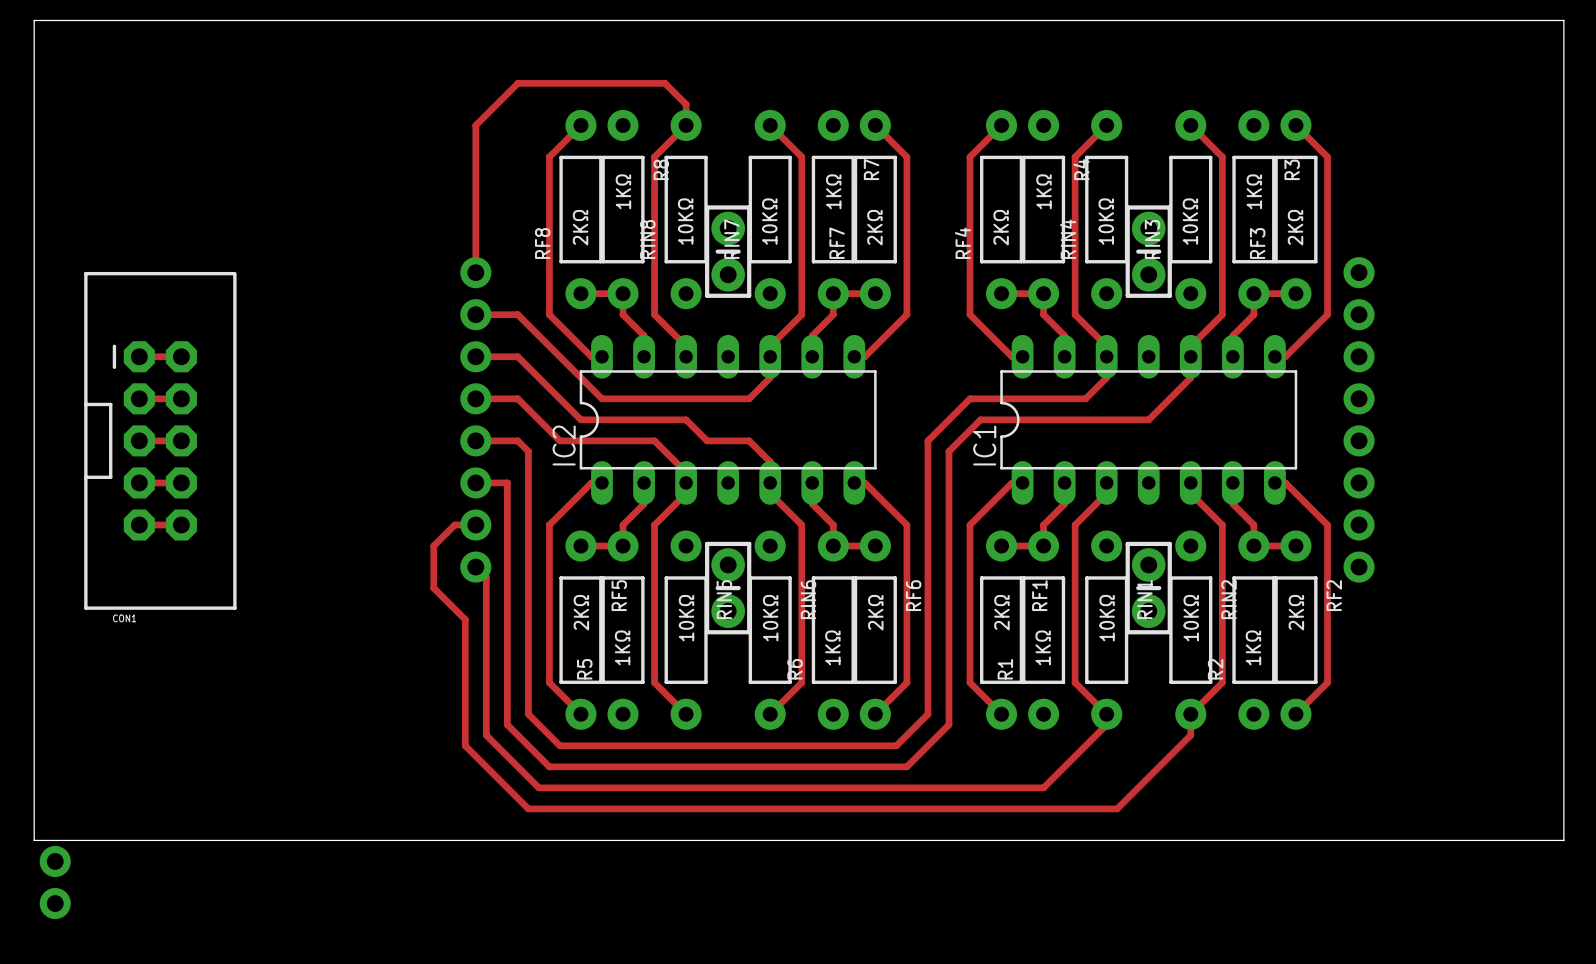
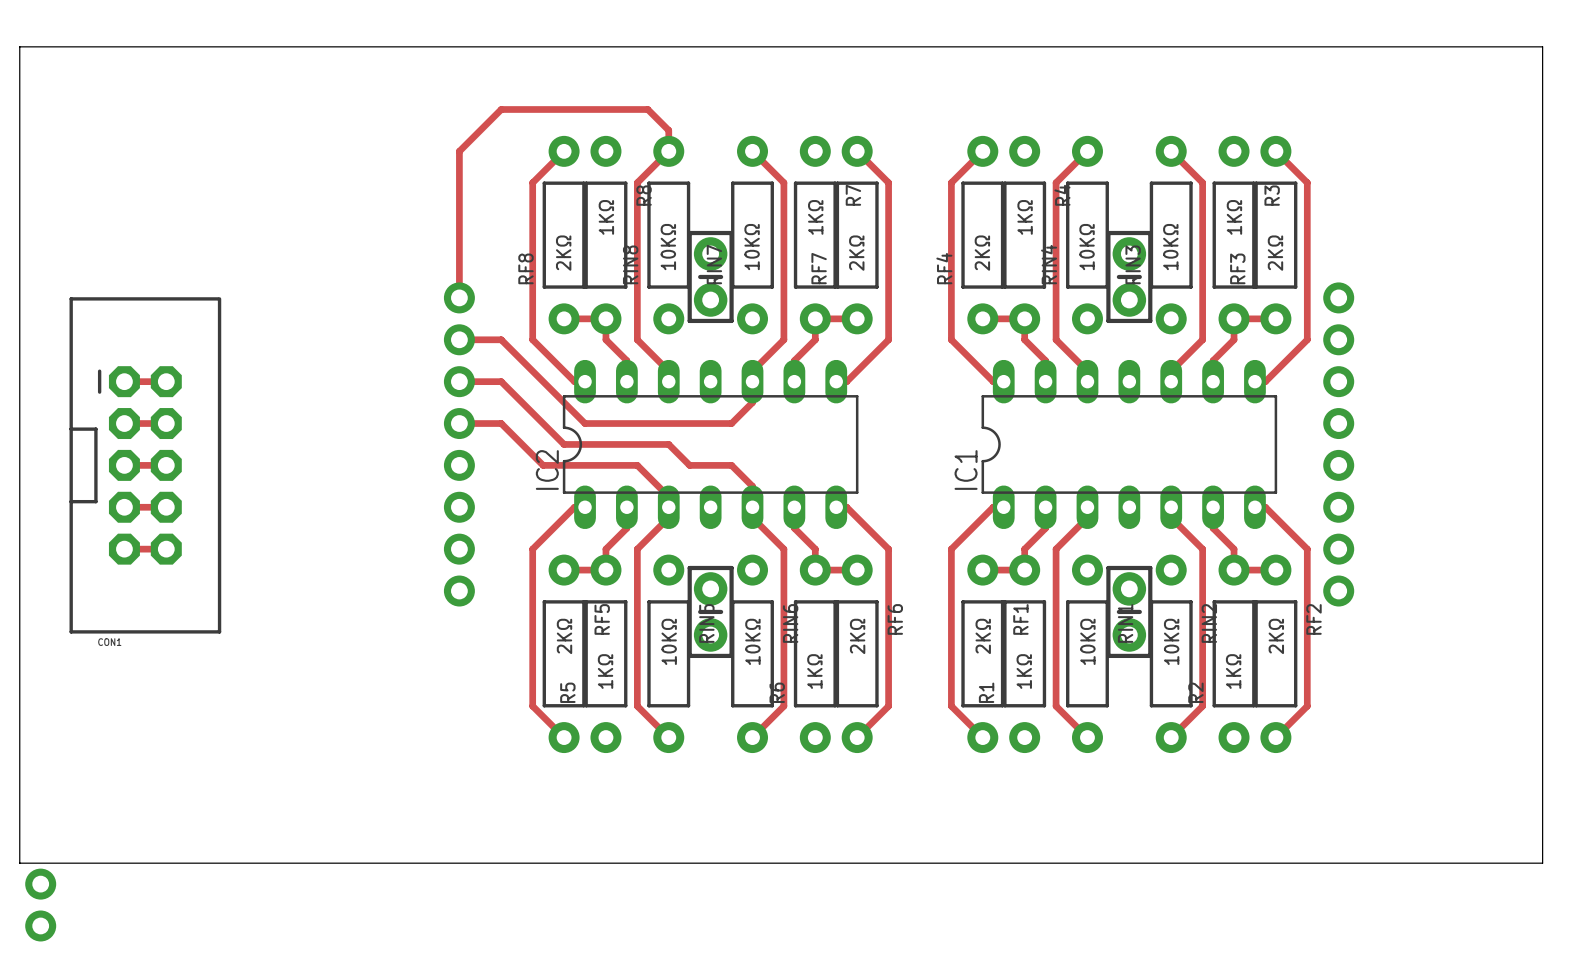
top track: (1106, 356) (1106, 377) (1085, 398) (970, 398) (927, 440) (927, 714) (896, 745) (559, 745) (528, 714) (528, 451) (517, 440) (475, 440) -> none
top track: (1190, 356) (1190, 377) (1148, 419) (980, 419) (948, 451) (948, 724) (906, 766) (549, 766) (507, 724) (507, 482) (475, 482) -> none
top track: (475, 525) (454, 525) (433, 546) (433, 588) (465, 619) (465, 745) (528, 808) (1117, 808) (1190, 735) (1190, 714) -> none
top track: (475, 567) (486, 577) (486, 735) (538, 787) (1043, 787) (1106, 724) (1106, 714) -> none

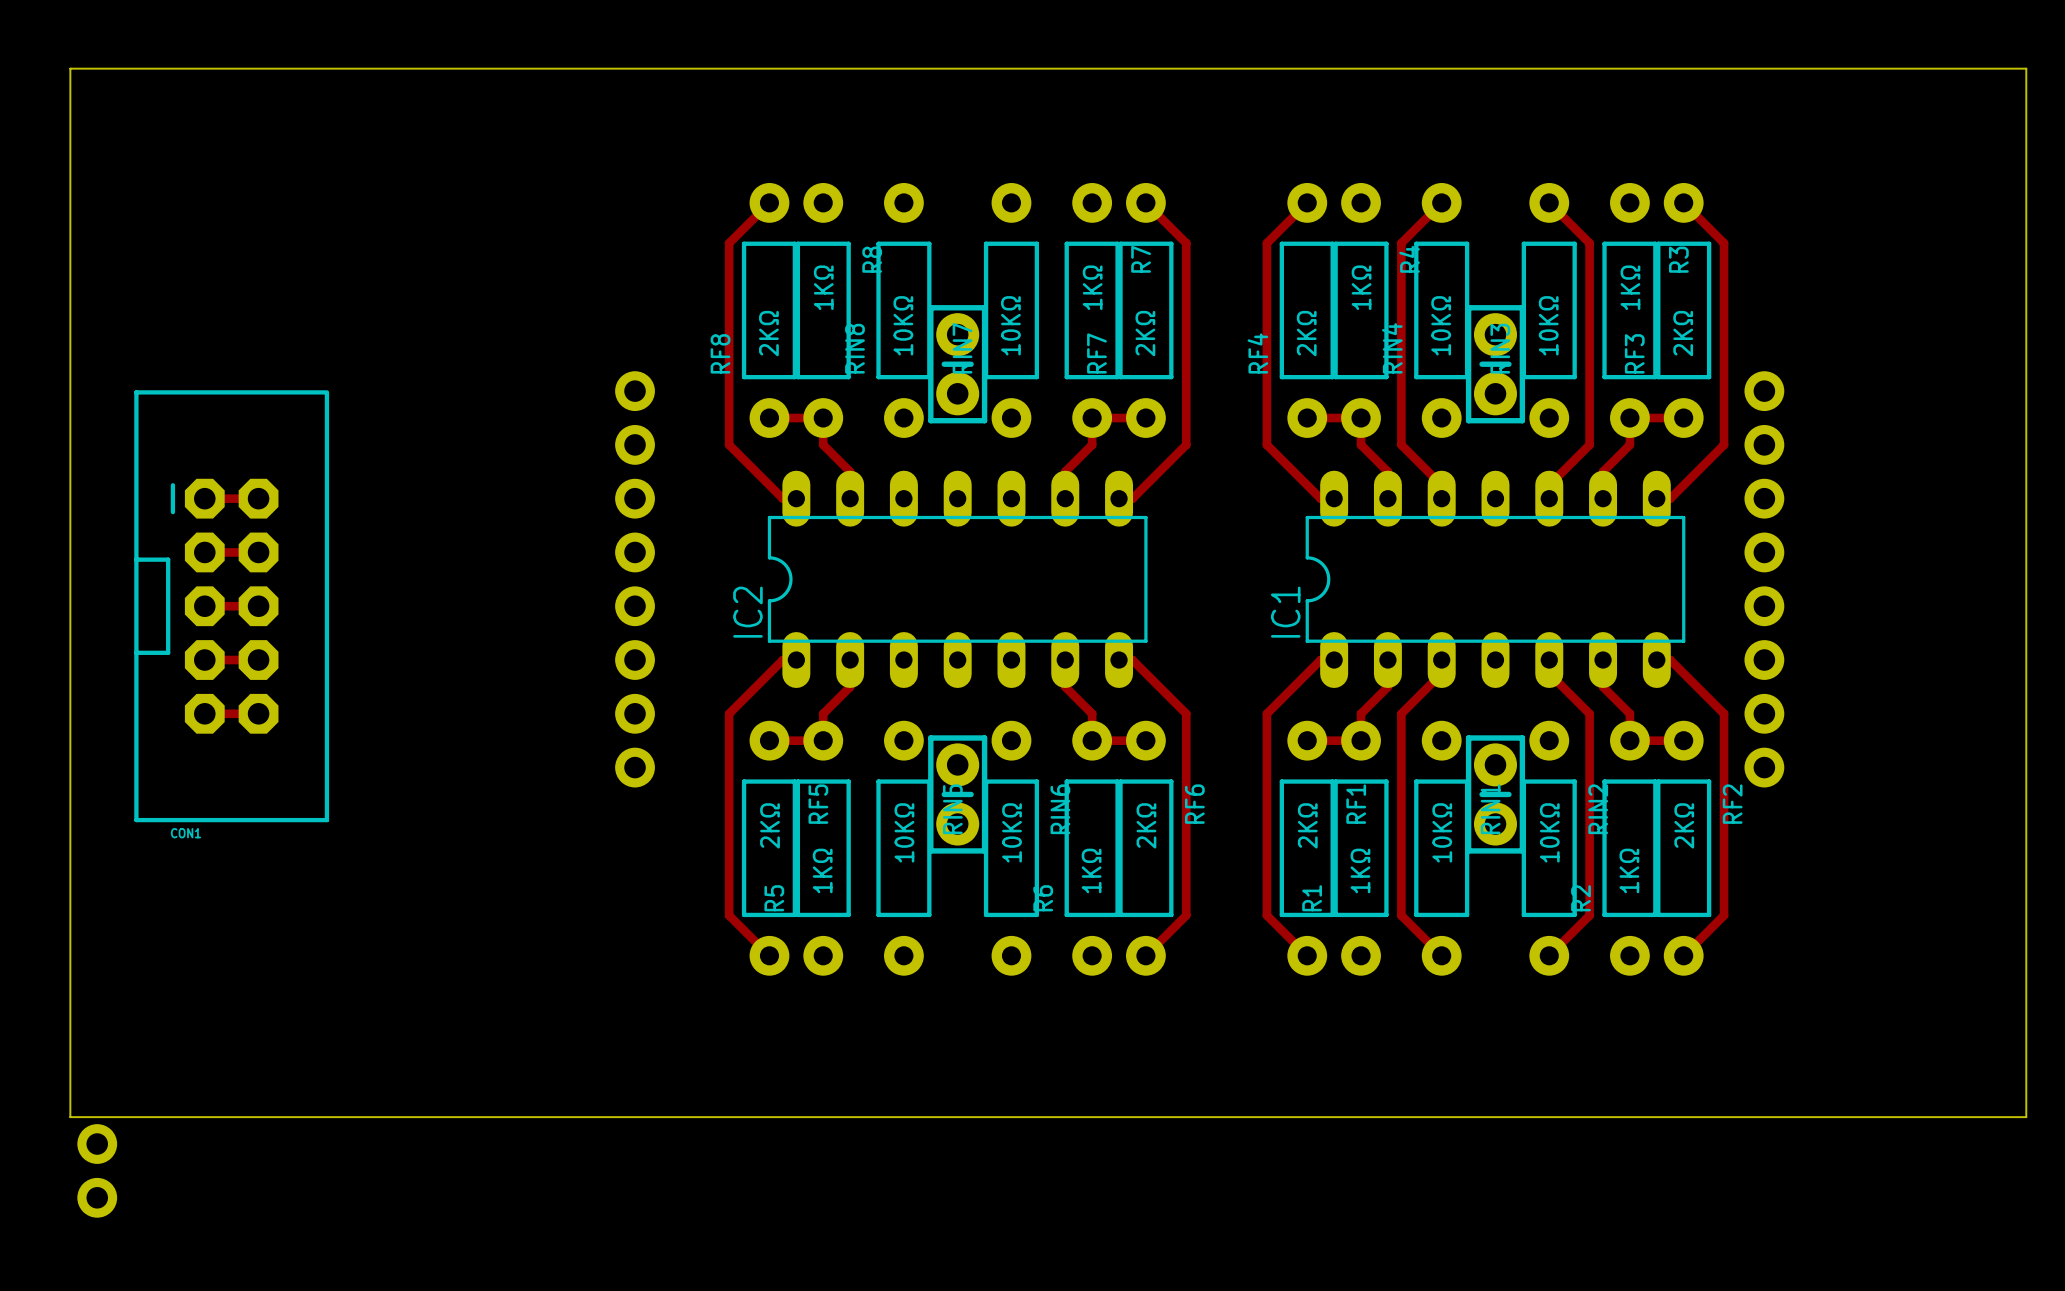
top track: (752, 151) (783, 182) (783, 339) (752, 371) (752, 402) (731, 423) (585, 423) (501, 339) (459, 339) -> none
top track: (459, 297) (459, 151) (501, 109) (647, 109) (668, 130) (668, 151) (637, 182) (637, 339) (668, 371) (668, 381) -> none
top track: (459, 381) (501, 381) (564, 444) (668, 444) (689, 465) (731, 465) (752, 486) (752, 517) (783, 549) (783, 706) (752, 737) -> none
top track: (459, 423) (501, 423) (543, 465) (637, 465) (668, 496) (668, 517) (637, 549) (637, 706) (668, 737) -> none

